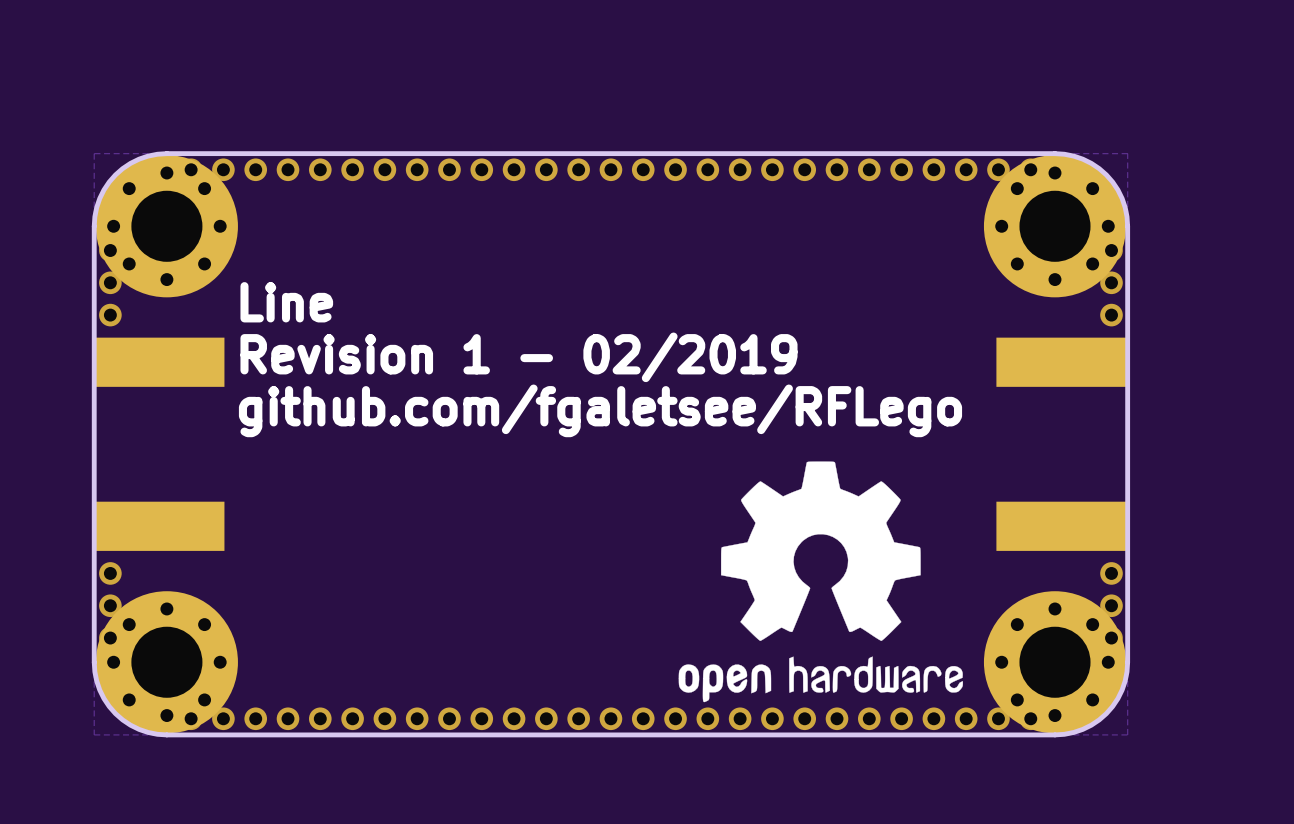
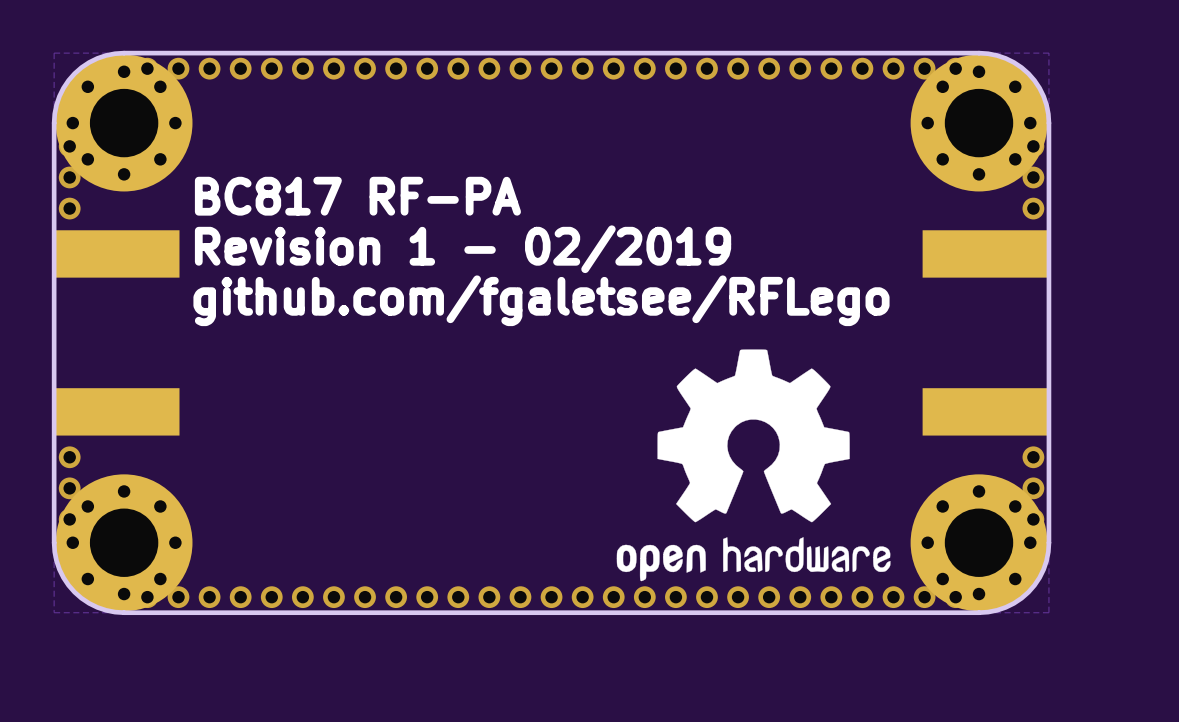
text: Line (286, 302) -> BC817 RF-PA (357, 196)

